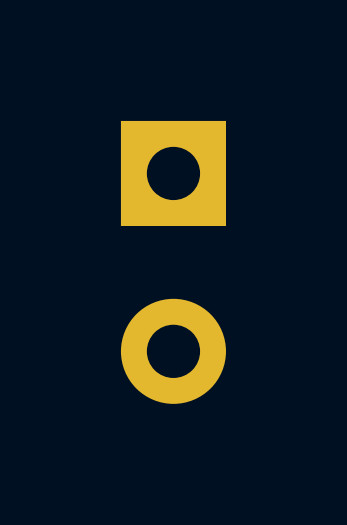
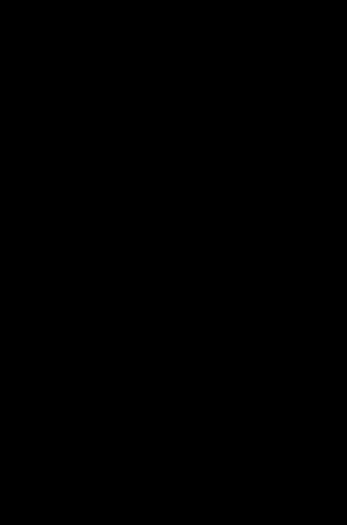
part: (173, 262) -> none

